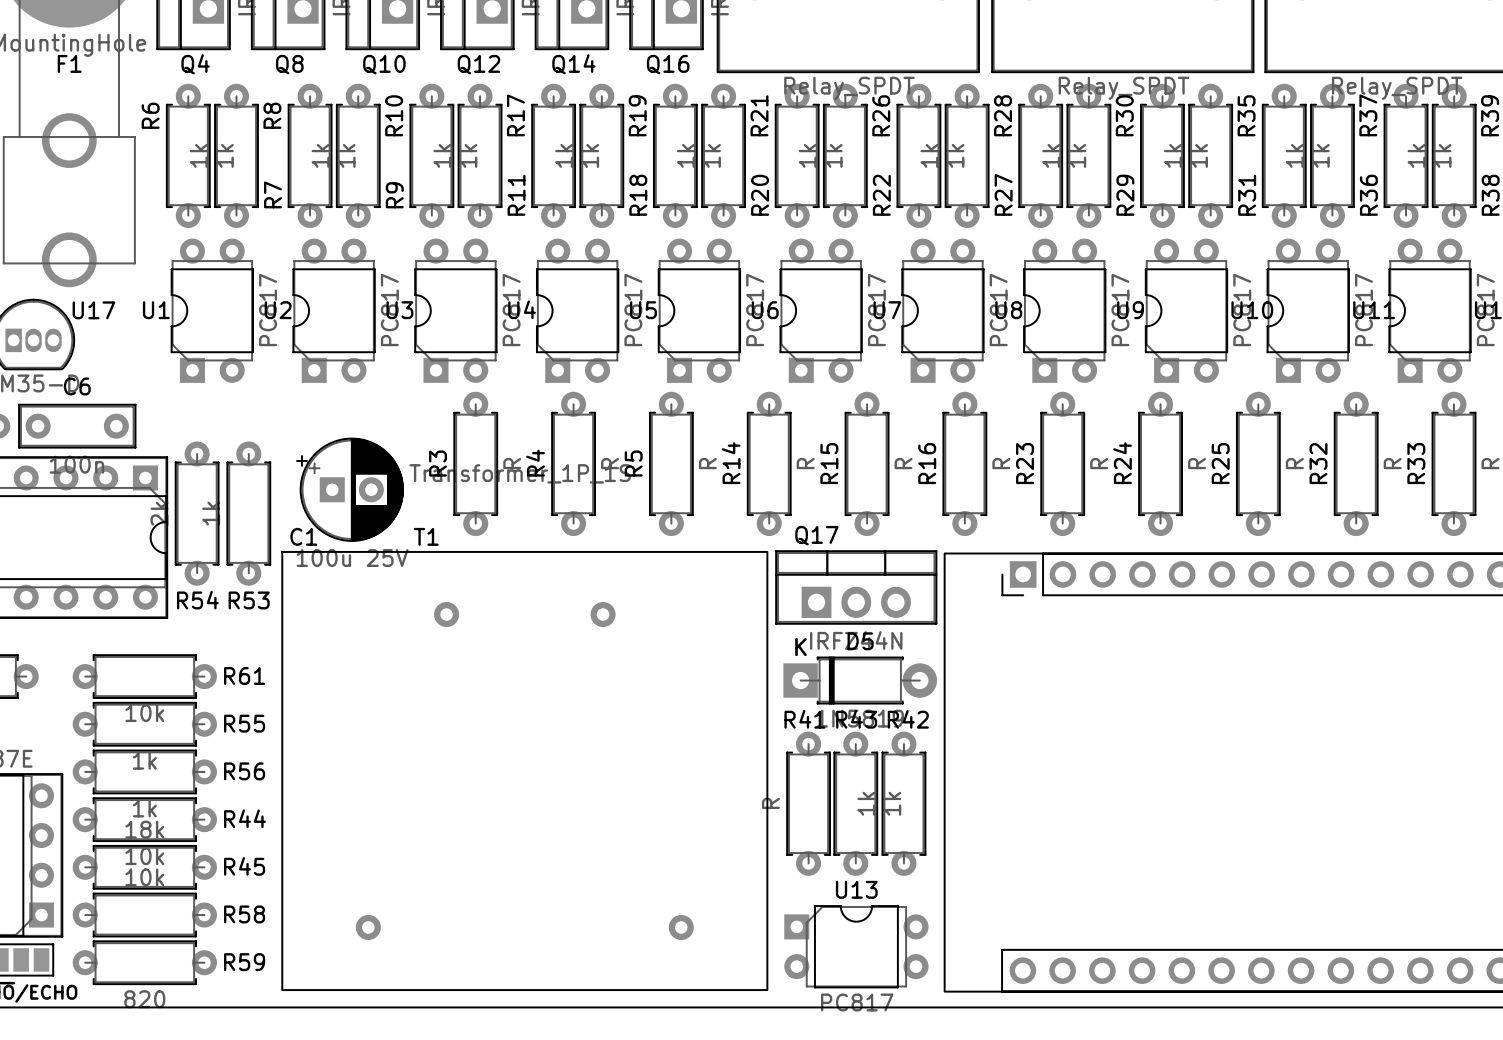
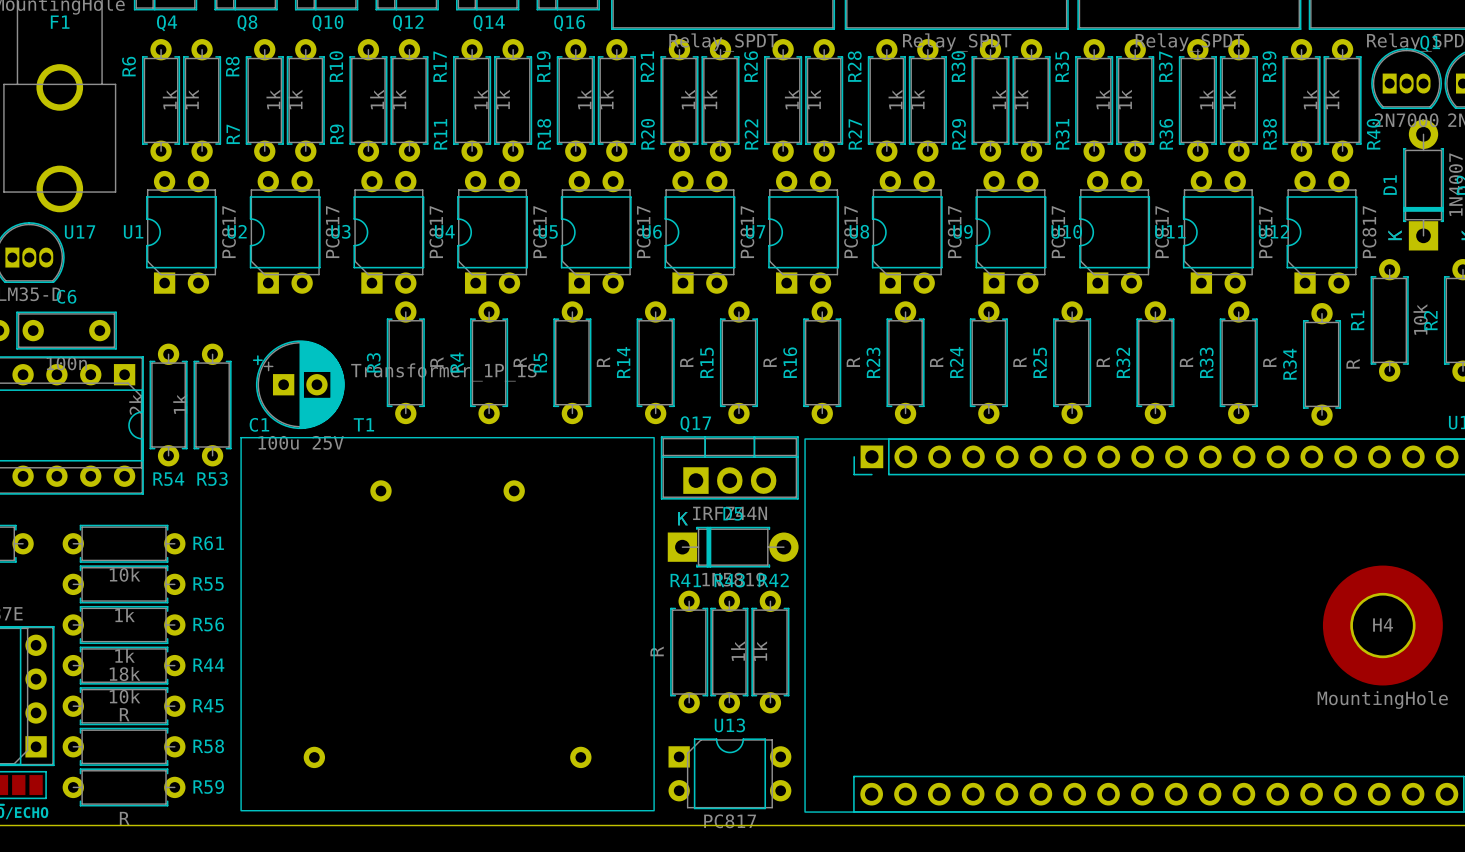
R58 value: 10k (144, 877) -> R (124, 714)
R59 value: 820 (144, 999) -> R (124, 818)

